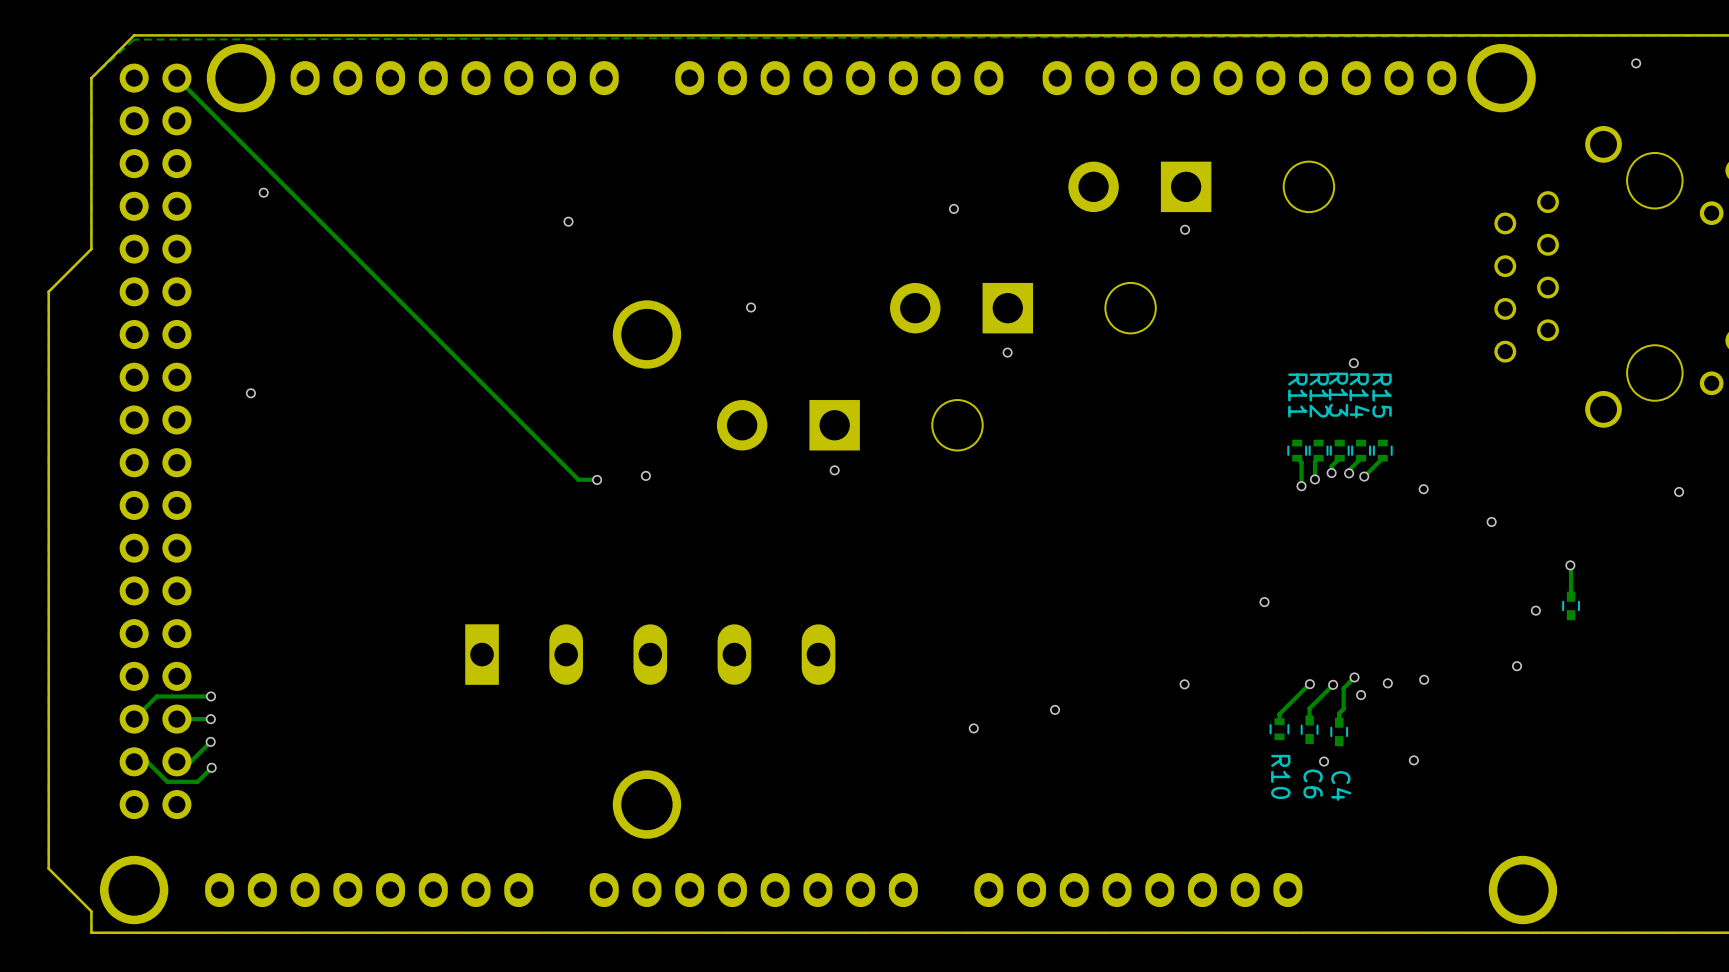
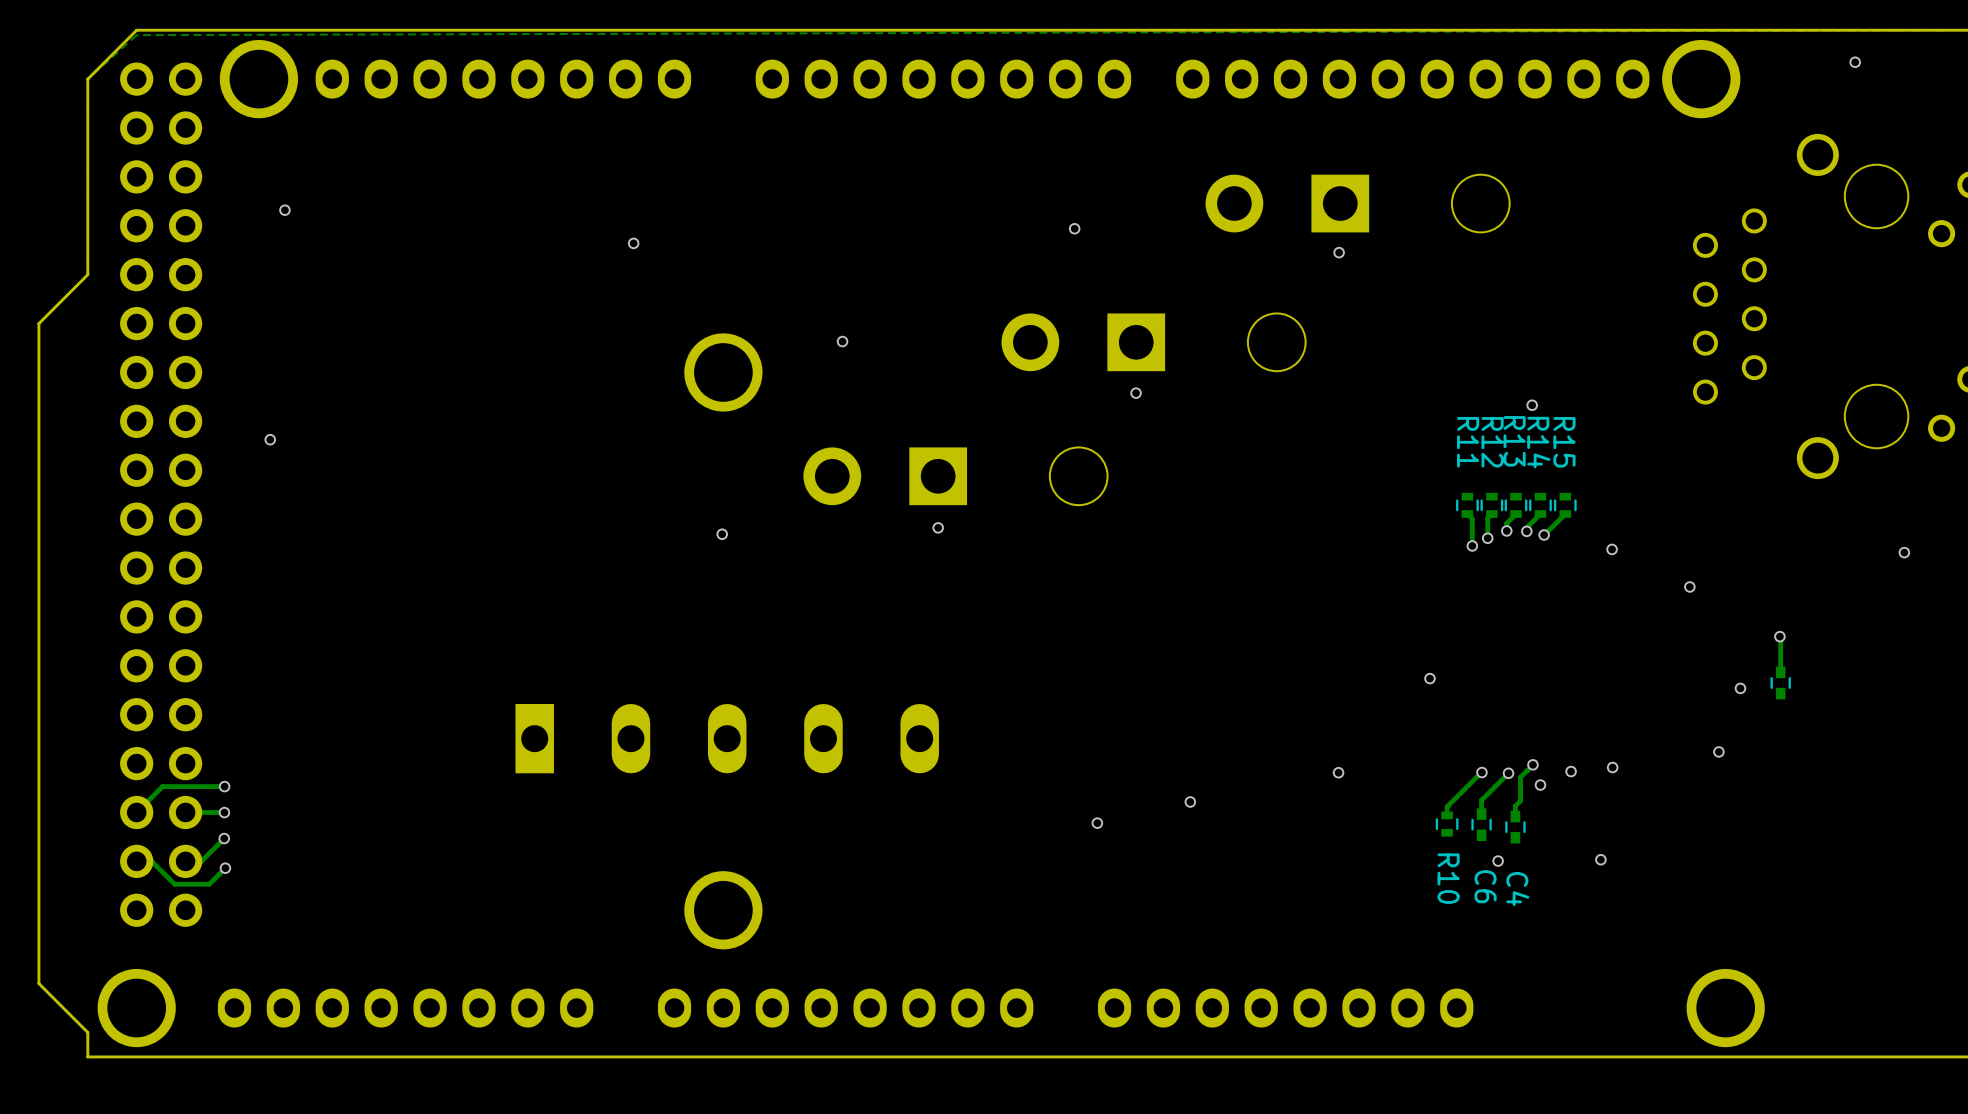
track: (176, 78) (578, 479) (595, 479) -> none
via: (597, 479) -> none

